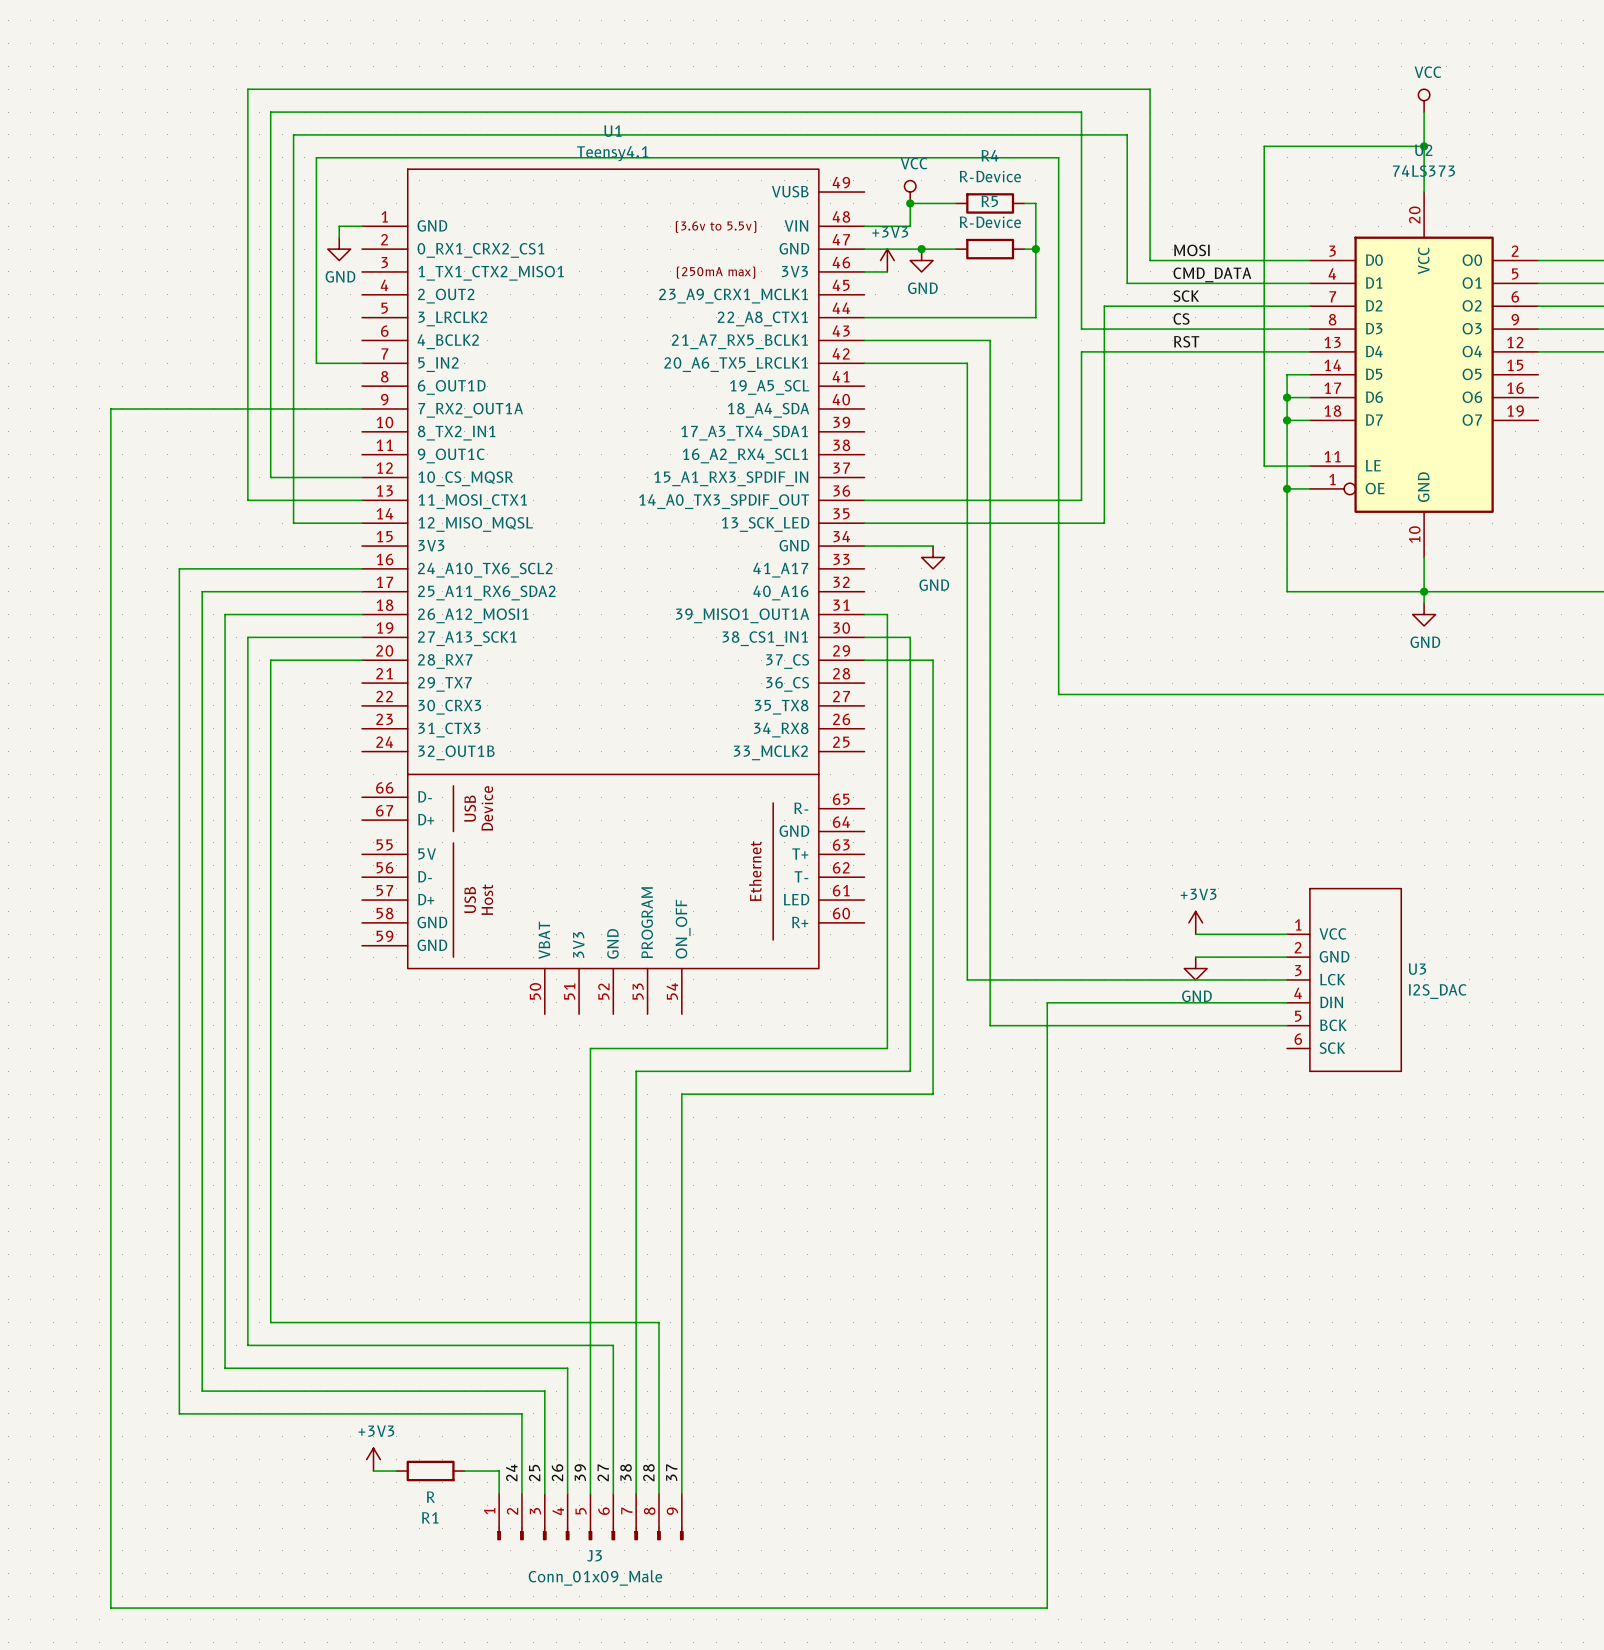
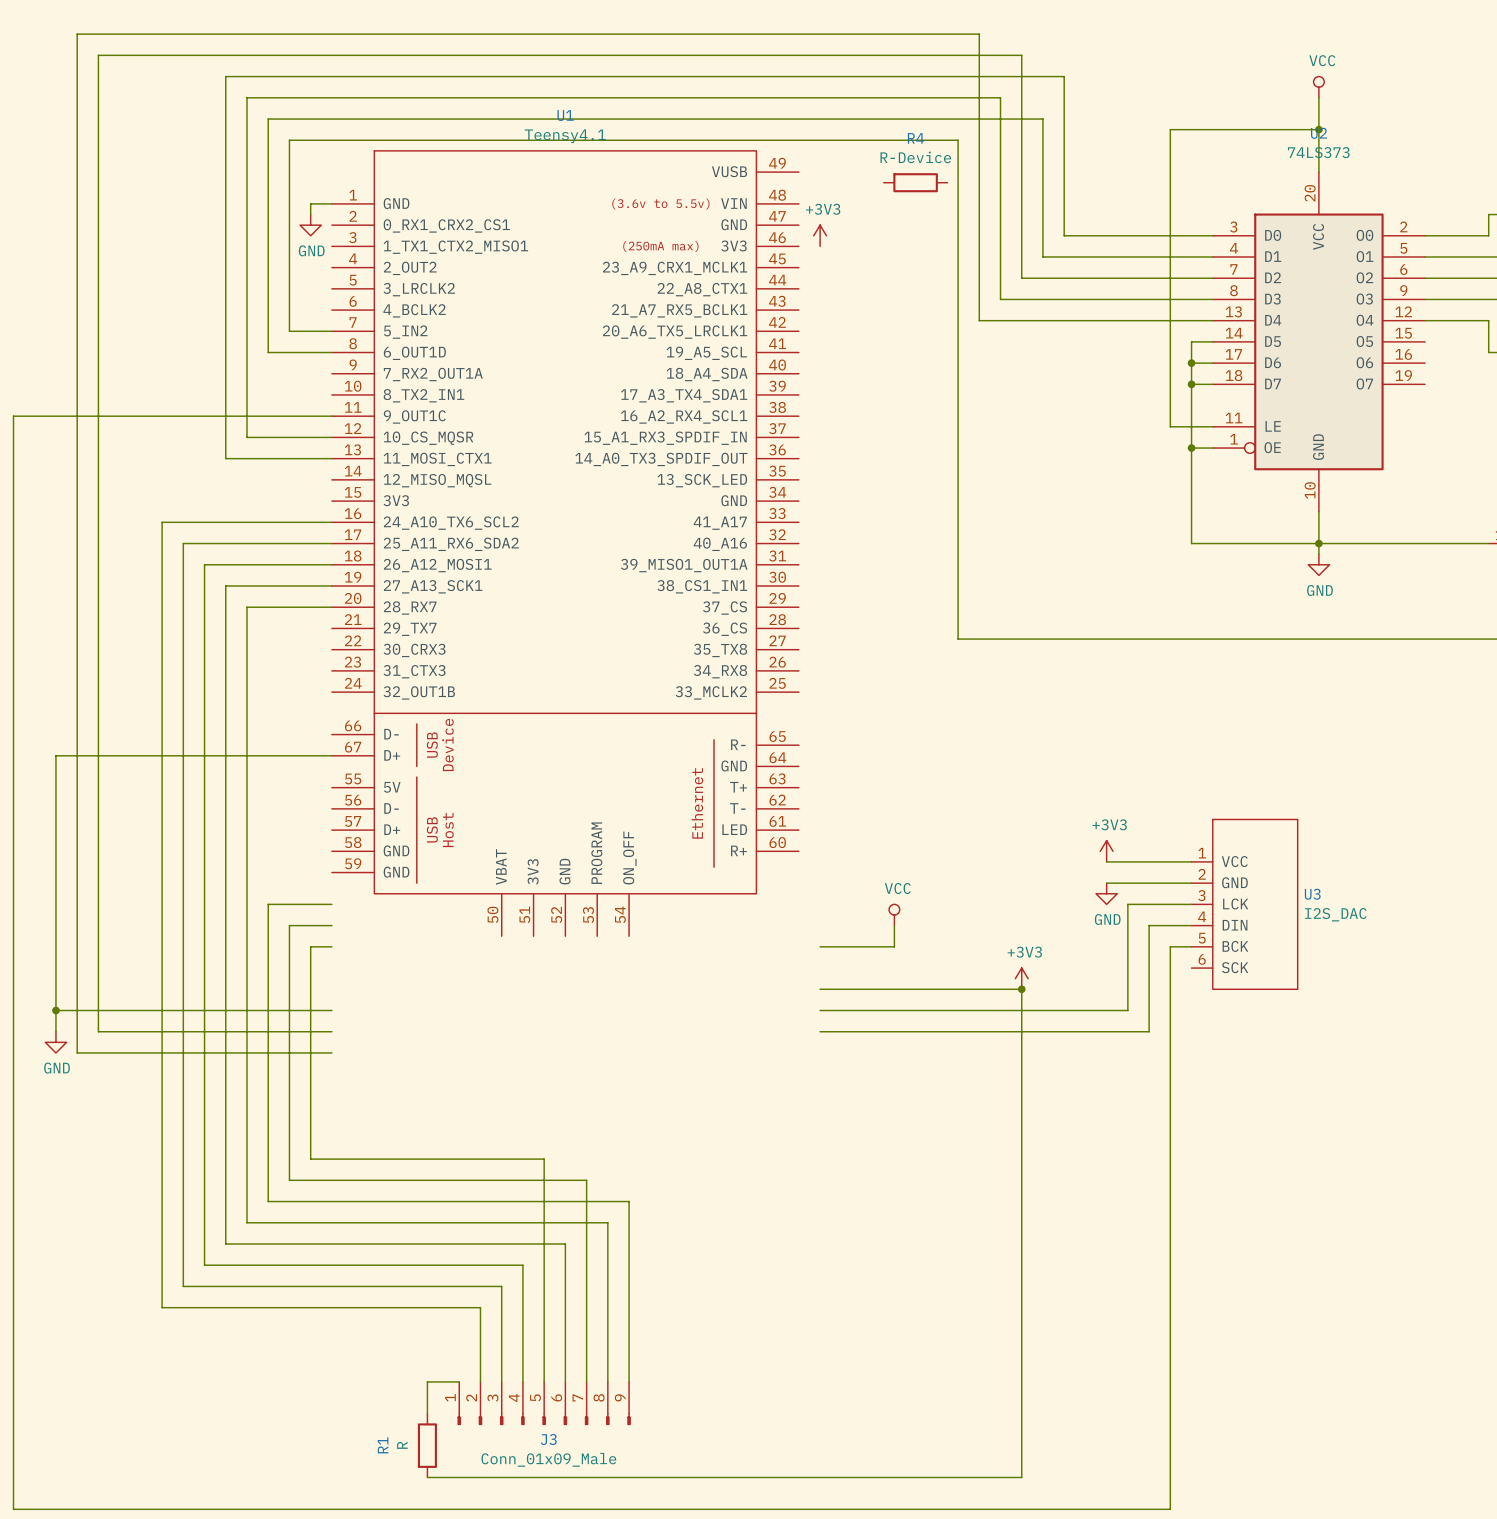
wire: (1035, 157) (1058, 157) -> (331, 1052) (77, 1052) (77, 34) (979, 34) (979, 140)
power symbol: VCC (910, 192) -> none
junction: (910, 203) -> none
wire: (955, 203) (910, 203) (910, 226) (864, 226) -> none
wire: (1024, 203) (1035, 203) -> (958, 140) (958, 182)
wire: (864, 249) (955, 249) -> none
junction: (921, 249) -> none
R5: R-Device (990, 249) -> none
wire: (1024, 249) (1035, 249) -> none
junction: (1035, 249) -> none
label: MOSI (1191, 250) -> none
power symbol: GND (921, 260) -> none
wire: (864, 271) (887, 271) -> none
label: CMD_DATA (1212, 274) -> none
label: SCK (1186, 296) -> none
wire: (1104, 306) (1104, 523) (864, 523) -> none
wire: (864, 317) (1035, 317) -> none
label: CS (1181, 318) -> none
wire: (864, 340) (990, 340) (990, 1025) (1264, 1025) -> (331, 416) (13, 416) (13, 1509) (1170, 1509) (1170, 946)
label: RST (1186, 341) -> none
wire: (1058, 351) (1058, 694) -> (958, 288) (958, 639) (979, 639)
wire: (1081, 351) (1081, 500) (864, 500) -> (1000, 320) (979, 320)
wire: (864, 363) (967, 363) (967, 979) (1218, 979) -> none
wire: (293, 386) (293, 523) (362, 523) -> (268, 352) (331, 352)
wire: (110, 408) (362, 408) -> (98, 373) (98, 55) (1021, 55) (1021, 278)
wire: (864, 546) (933, 546) -> none
power symbol: GND (933, 557) -> none
wire: (864, 614) (887, 614) (887, 1048) (590, 1048) (590, 1254) -> (331, 946) (310, 946) (310, 1159) (544, 1159)
wire: (864, 637) (910, 637) (910, 1071) -> (427, 1477) (1021, 1477) (1021, 989) (841, 989)
wire: (864, 660) (933, 660) (933, 1094) -> (1127, 904) (1127, 1010) (862, 1010)
wire: none -> (331, 755) (55, 755) (55, 1031)
power symbol: none -> VCC (894, 915)
wire: none -> (894, 925) (894, 946) (820, 946)
wire: (1241, 1002) (1047, 1002) (1047, 1608) (110, 1608) (110, 1117) -> (1149, 925) (1149, 1031) (820, 1031)
power symbol: none -> +3V3 (1021, 978)
wire: (887, 1071) (636, 1071) (636, 1276) -> (331, 925) (289, 925) (289, 1180) (586, 1180)
junction: none -> (1021, 989)
wire: none -> (55, 1010) (331, 1010)
junction: none -> (55, 1010)
wire: (887, 1094) (681, 1094) (681, 1299) -> (331, 904) (268, 904) (268, 1201) (629, 1201)
wire: none -> (98, 1031) (331, 1031)
power symbol: none -> GND (55, 1042)
power symbol: +3V3 (373, 1459) -> none
wire: (373, 1471) (396, 1471) -> none
R1 rotation: 0° (430, 1471) -> 90° clockwise (427, 1445)
R1 position: (430, 1471) -> (427, 1445)
wire: (464, 1471) (499, 1471) (499, 1493) -> (427, 1413) (427, 1381) (459, 1381)
label: 24 (511, 1472) -> none
label: 26 (557, 1472) -> none
label: 39 (580, 1472) -> none
label: 27 (603, 1472) -> none
label: 38 (626, 1472) -> none
label: 28 (648, 1472) -> none
label: 37 (671, 1472) -> none
label: 25 (534, 1473) -> none

